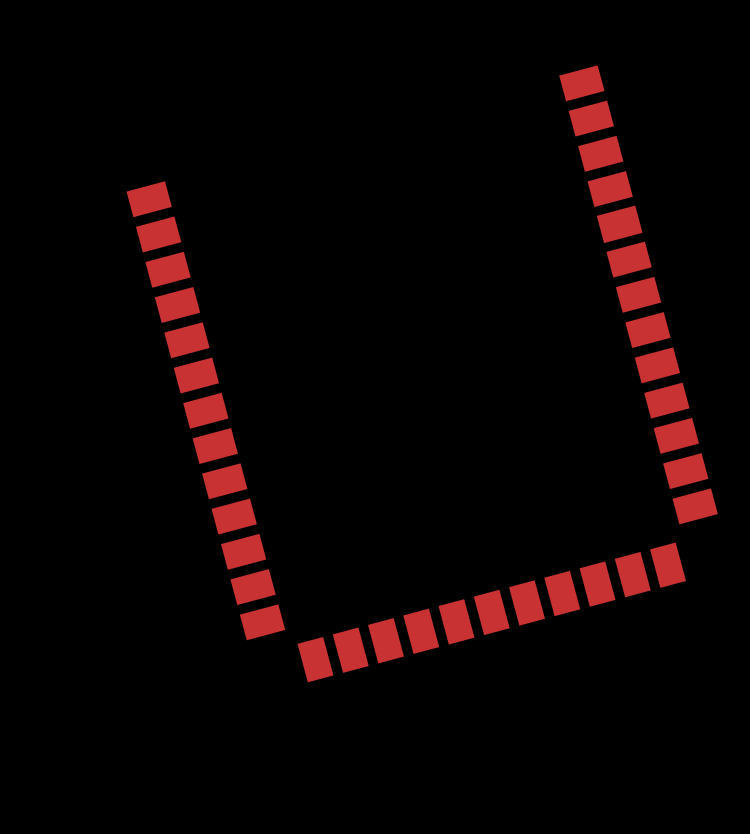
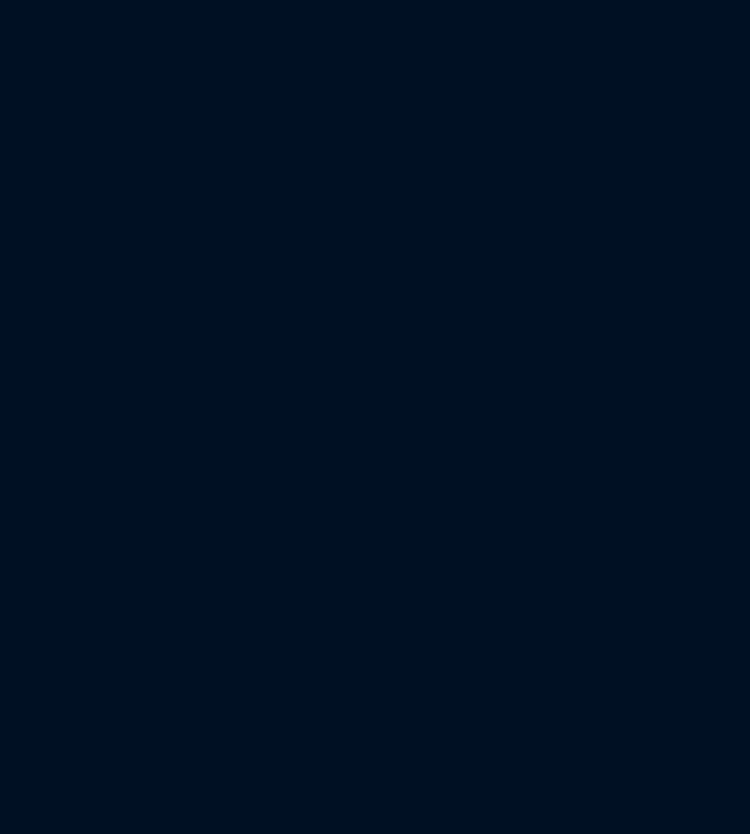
part: (422, 373) -> none

